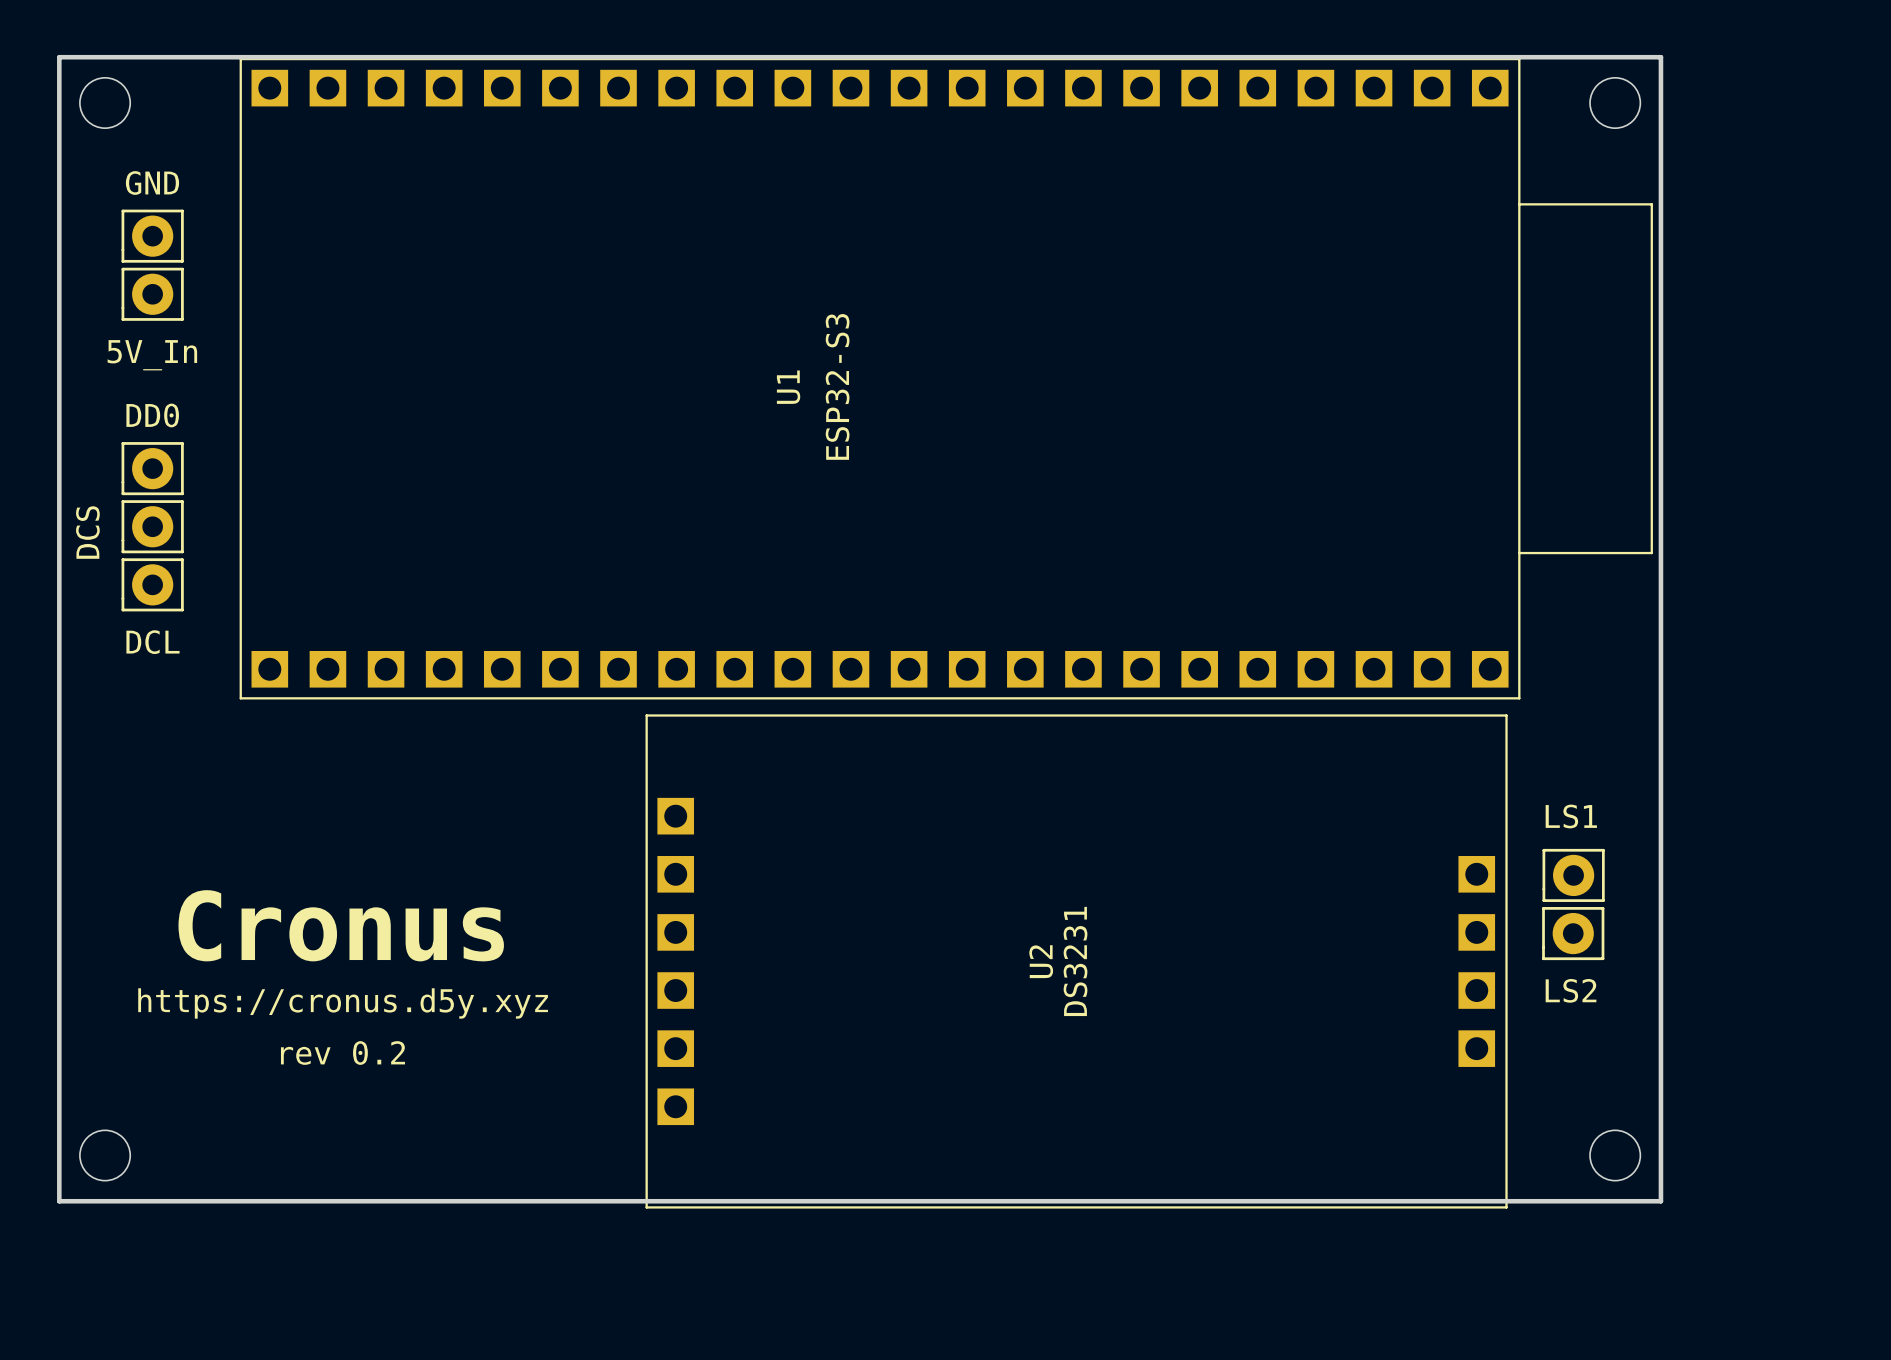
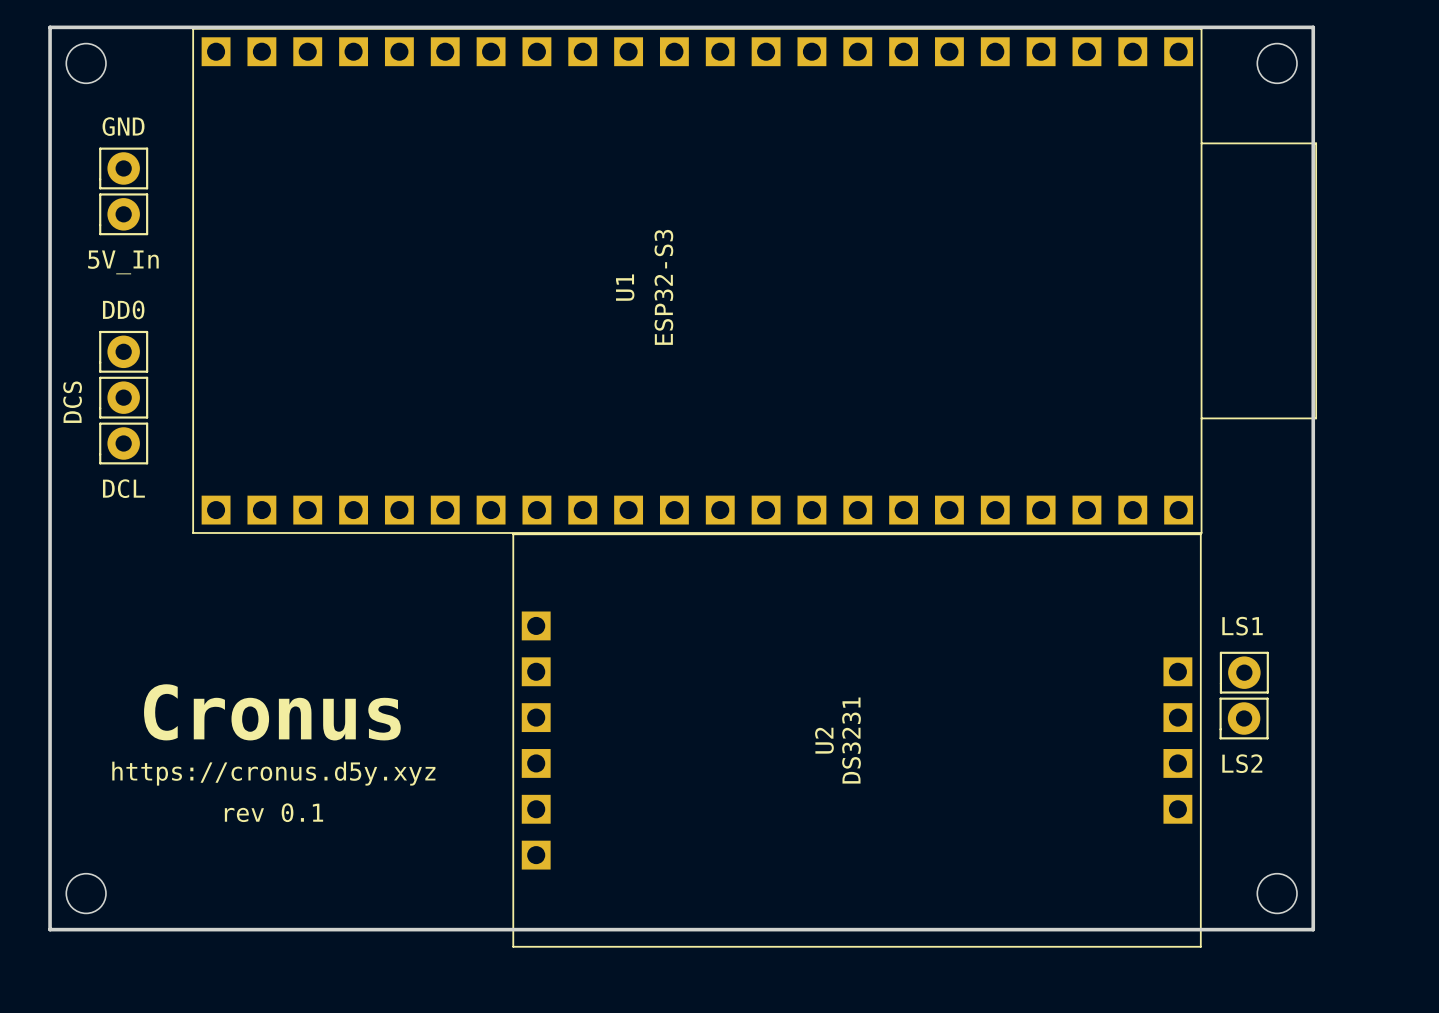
U1 footprint: [239, 57, 1653, 700] -> [192, 27, 1318, 534]
U2 footprint: [645, 714, 1508, 1209] -> [512, 533, 1202, 948]
text: rev 0.2 (342, 1053) -> rev 0.1 (273, 812)

